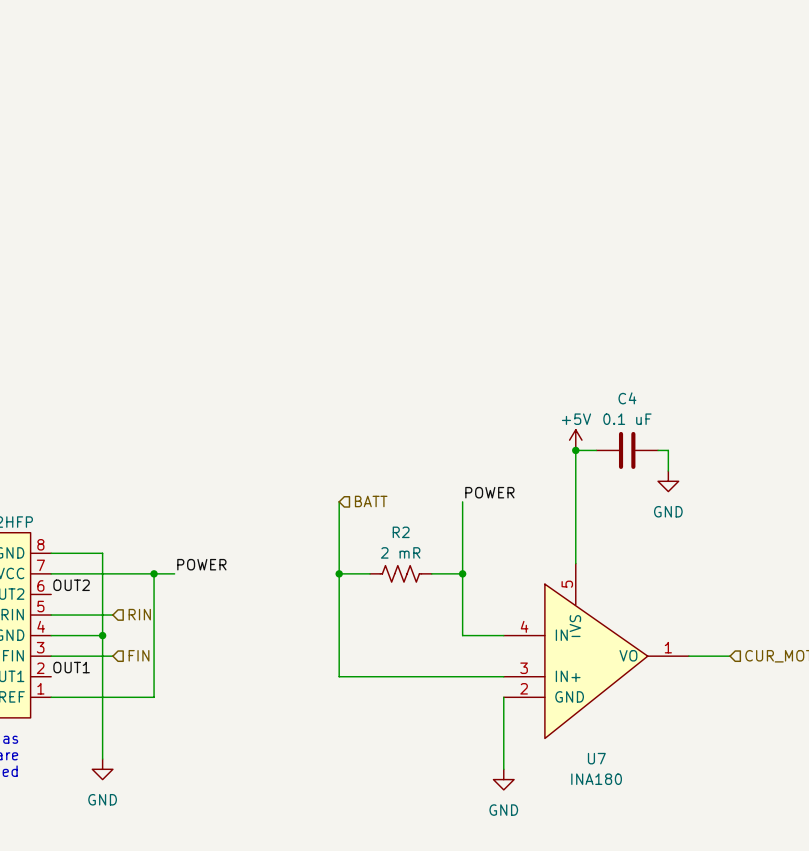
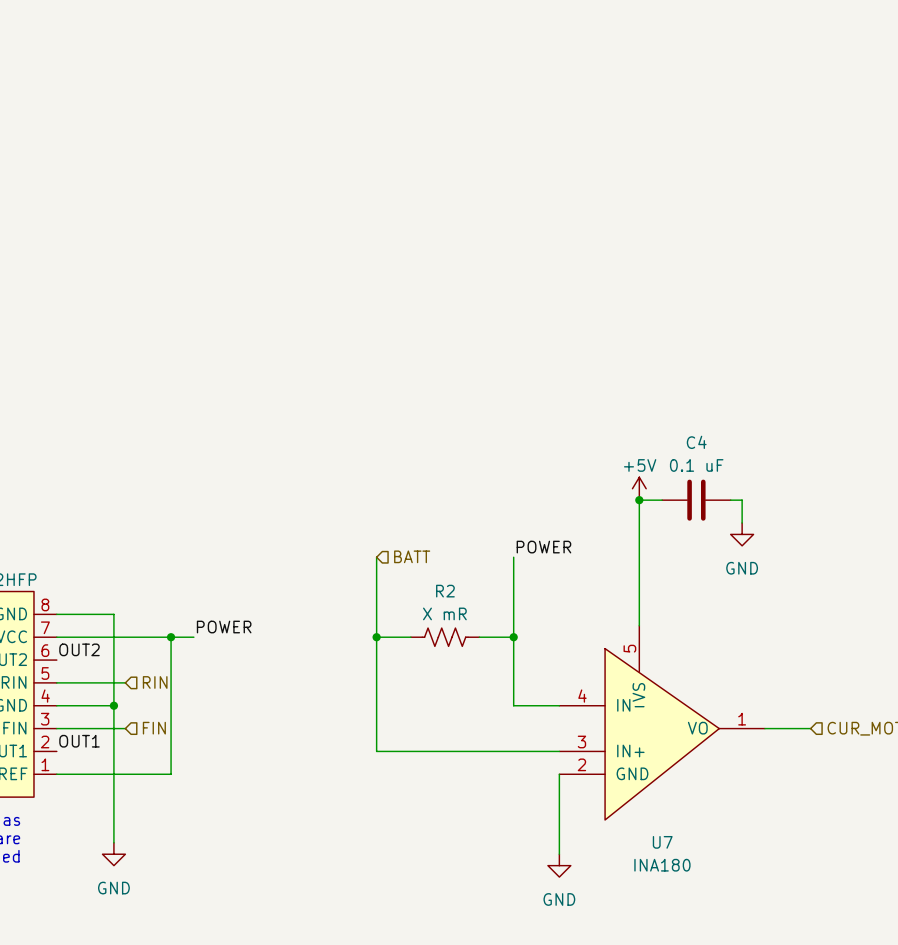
R2 value: 2 mR (400, 552) -> X mR (444, 613)

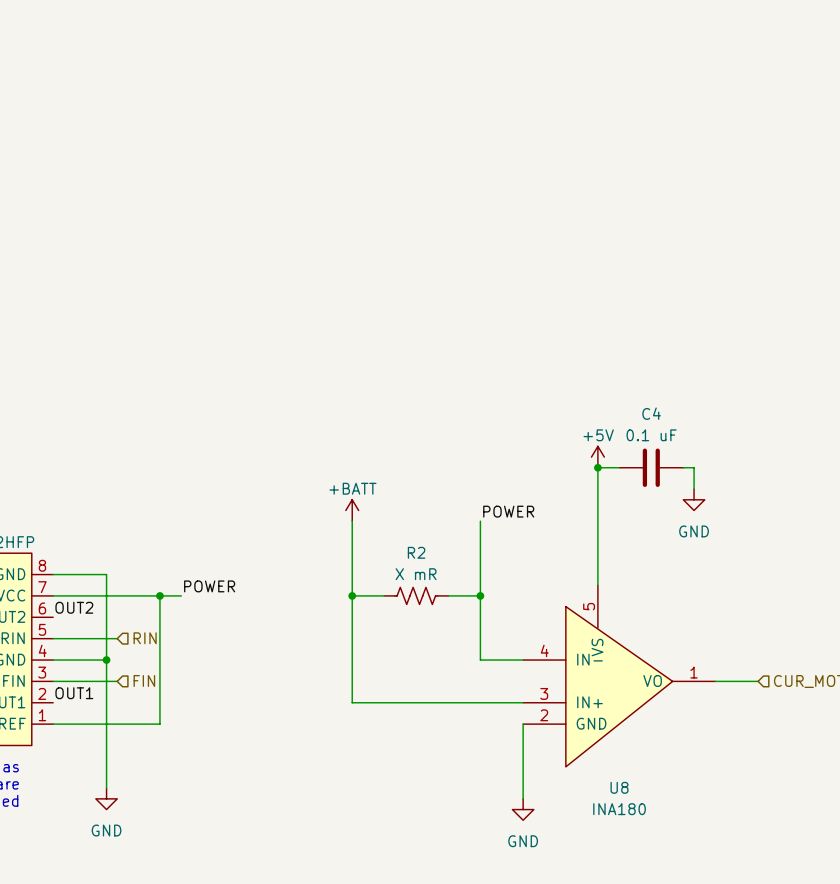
power symbol: none -> +BATT (352, 510)
hierarchical label: BATT (412, 556) -> none
U7 name: U7 (662, 842) -> U8 (619, 787)

